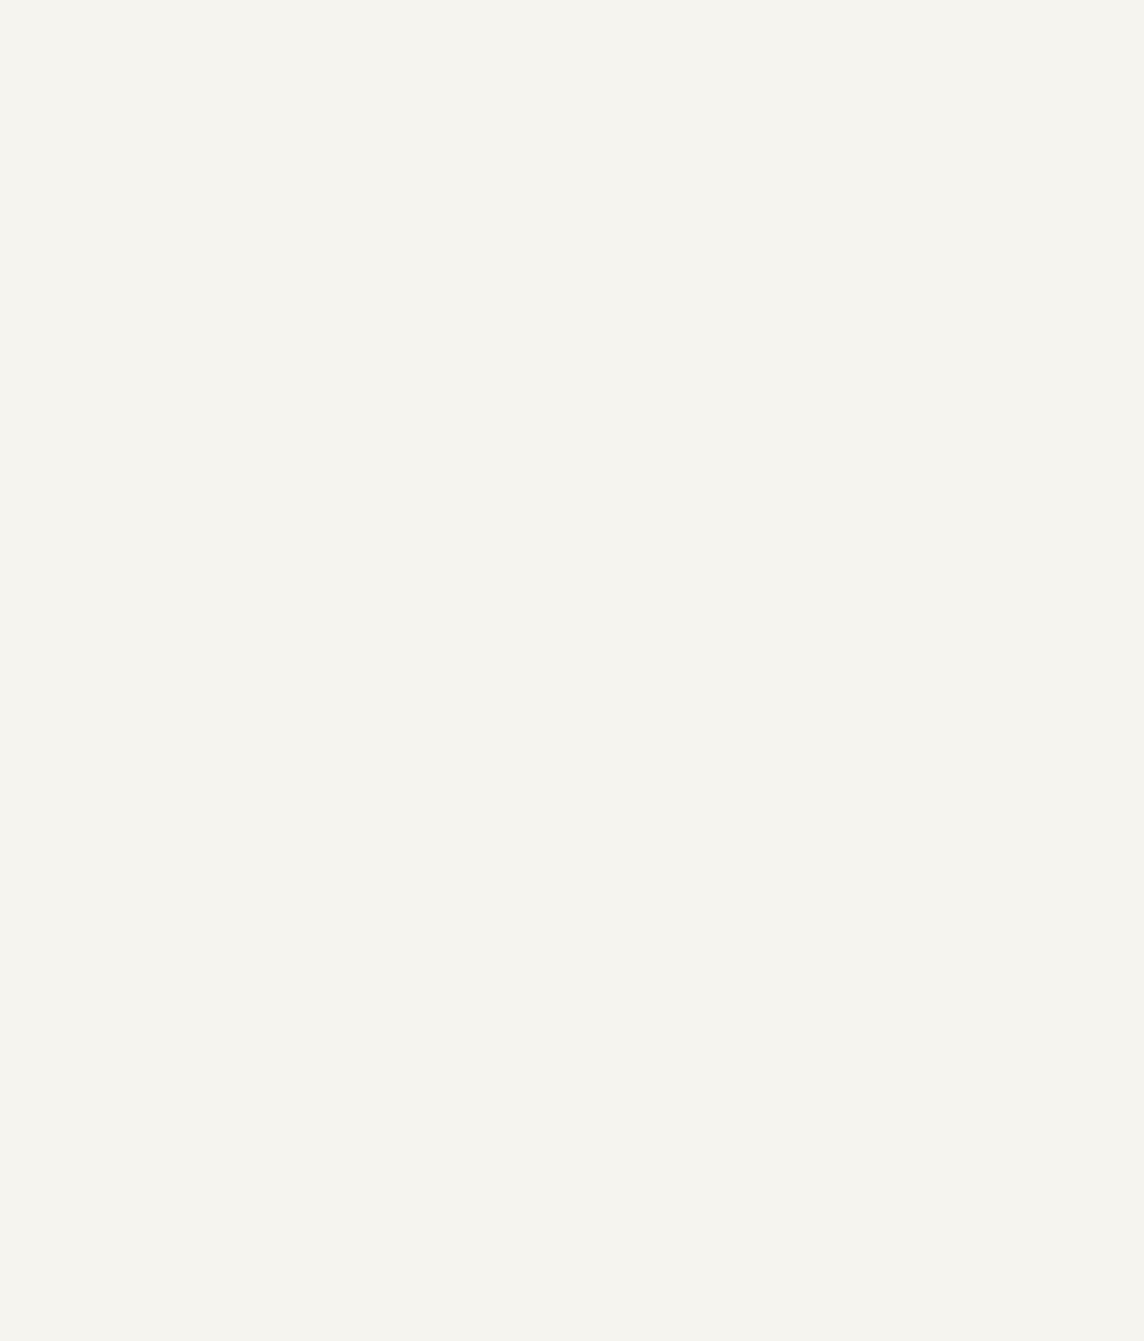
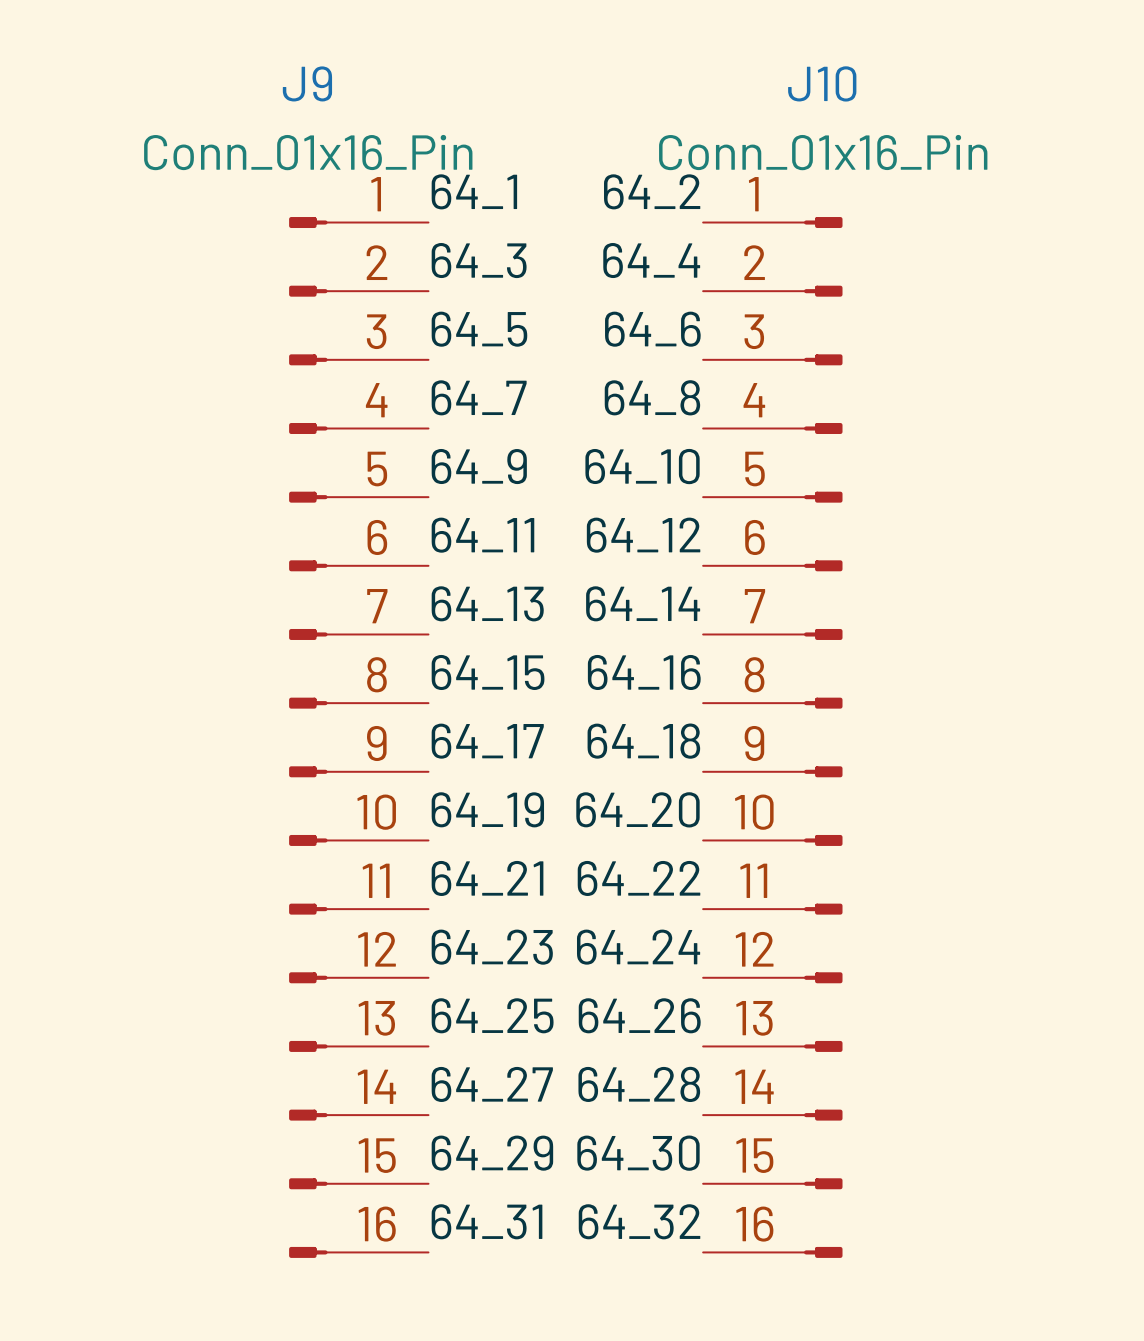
label: none -> 64_2 (652, 191)
label: none -> 64_1 (474, 191)
label: none -> 64_3 (479, 260)
label: none -> 64_4 (651, 260)
label: none -> 64_5 (479, 329)
label: none -> 64_6 (652, 329)
label: none -> 64_8 (652, 397)
label: none -> 64_7 (479, 397)
label: none -> 64_9 (479, 466)
label: none -> 64_10 (642, 466)
label: none -> 64_11 (482, 535)
label: none -> 64_12 (643, 535)
label: none -> 64_13 (487, 603)
label: none -> 64_14 (643, 603)
label: none -> 64_15 (488, 672)
label: none -> 64_16 (644, 672)
J9: none -> Conn_01x16_Pin (358, 737)
J10: none -> Conn_01x16_Pin (772, 737)
label: none -> 64_17 (487, 741)
label: none -> 64_18 (643, 741)
label: none -> 64_19 (487, 809)
label: none -> 64_20 (637, 809)
label: none -> 64_21 (487, 878)
label: none -> 64_22 (639, 878)
label: none -> 64_23 (492, 947)
label: none -> 64_24 (638, 947)
label: none -> 64_25 (492, 1015)
label: none -> 64_26 (639, 1015)
label: none -> 64_27 (492, 1084)
label: none -> 64_28 (639, 1084)
label: none -> 64_29 (492, 1153)
label: none -> 64_30 (638, 1153)
label: none -> 64_31 (487, 1221)
label: none -> 64_32 (639, 1221)

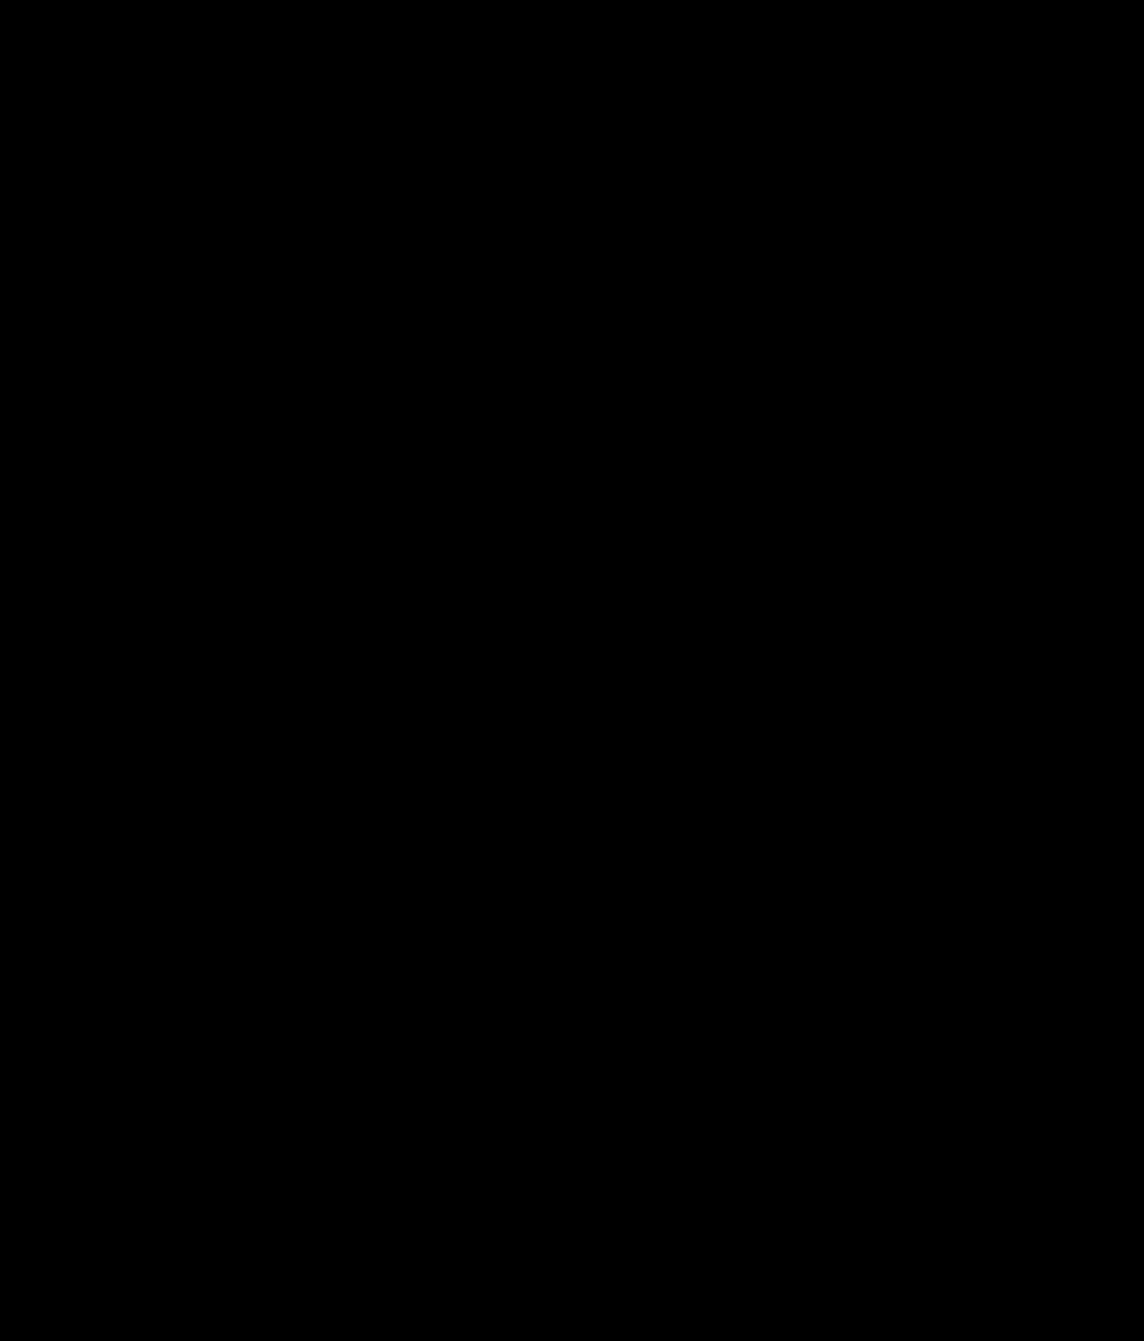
label: 64_1 (474, 191) -> none
label: 64_2 (652, 191) -> none
label: 64_3 (479, 260) -> none
label: 64_4 (651, 260) -> none
label: 64_5 (479, 329) -> none
label: 64_6 (652, 329) -> none
label: 64_7 (479, 397) -> none
label: 64_8 (652, 397) -> none
label: 64_9 (479, 466) -> none
label: 64_10 (642, 466) -> none
label: 64_11 (482, 535) -> none
label: 64_12 (643, 535) -> none
label: 64_13 (487, 603) -> none
label: 64_14 (643, 603) -> none
label: 64_15 (488, 672) -> none
label: 64_16 (644, 672) -> none
J9: Conn_01x16_Pin (358, 737) -> none
J10: Conn_01x16_Pin (772, 737) -> none
label: 64_17 (487, 741) -> none
label: 64_18 (643, 741) -> none
label: 64_19 (487, 809) -> none
label: 64_20 (637, 809) -> none
label: 64_21 (487, 878) -> none
label: 64_22 (639, 878) -> none
label: 64_23 (492, 947) -> none
label: 64_24 (638, 947) -> none
label: 64_25 (492, 1015) -> none
label: 64_26 (639, 1015) -> none
label: 64_27 (492, 1084) -> none
label: 64_28 (639, 1084) -> none
label: 64_29 (492, 1153) -> none
label: 64_30 (638, 1153) -> none
label: 64_31 (487, 1221) -> none
label: 64_32 (639, 1221) -> none

